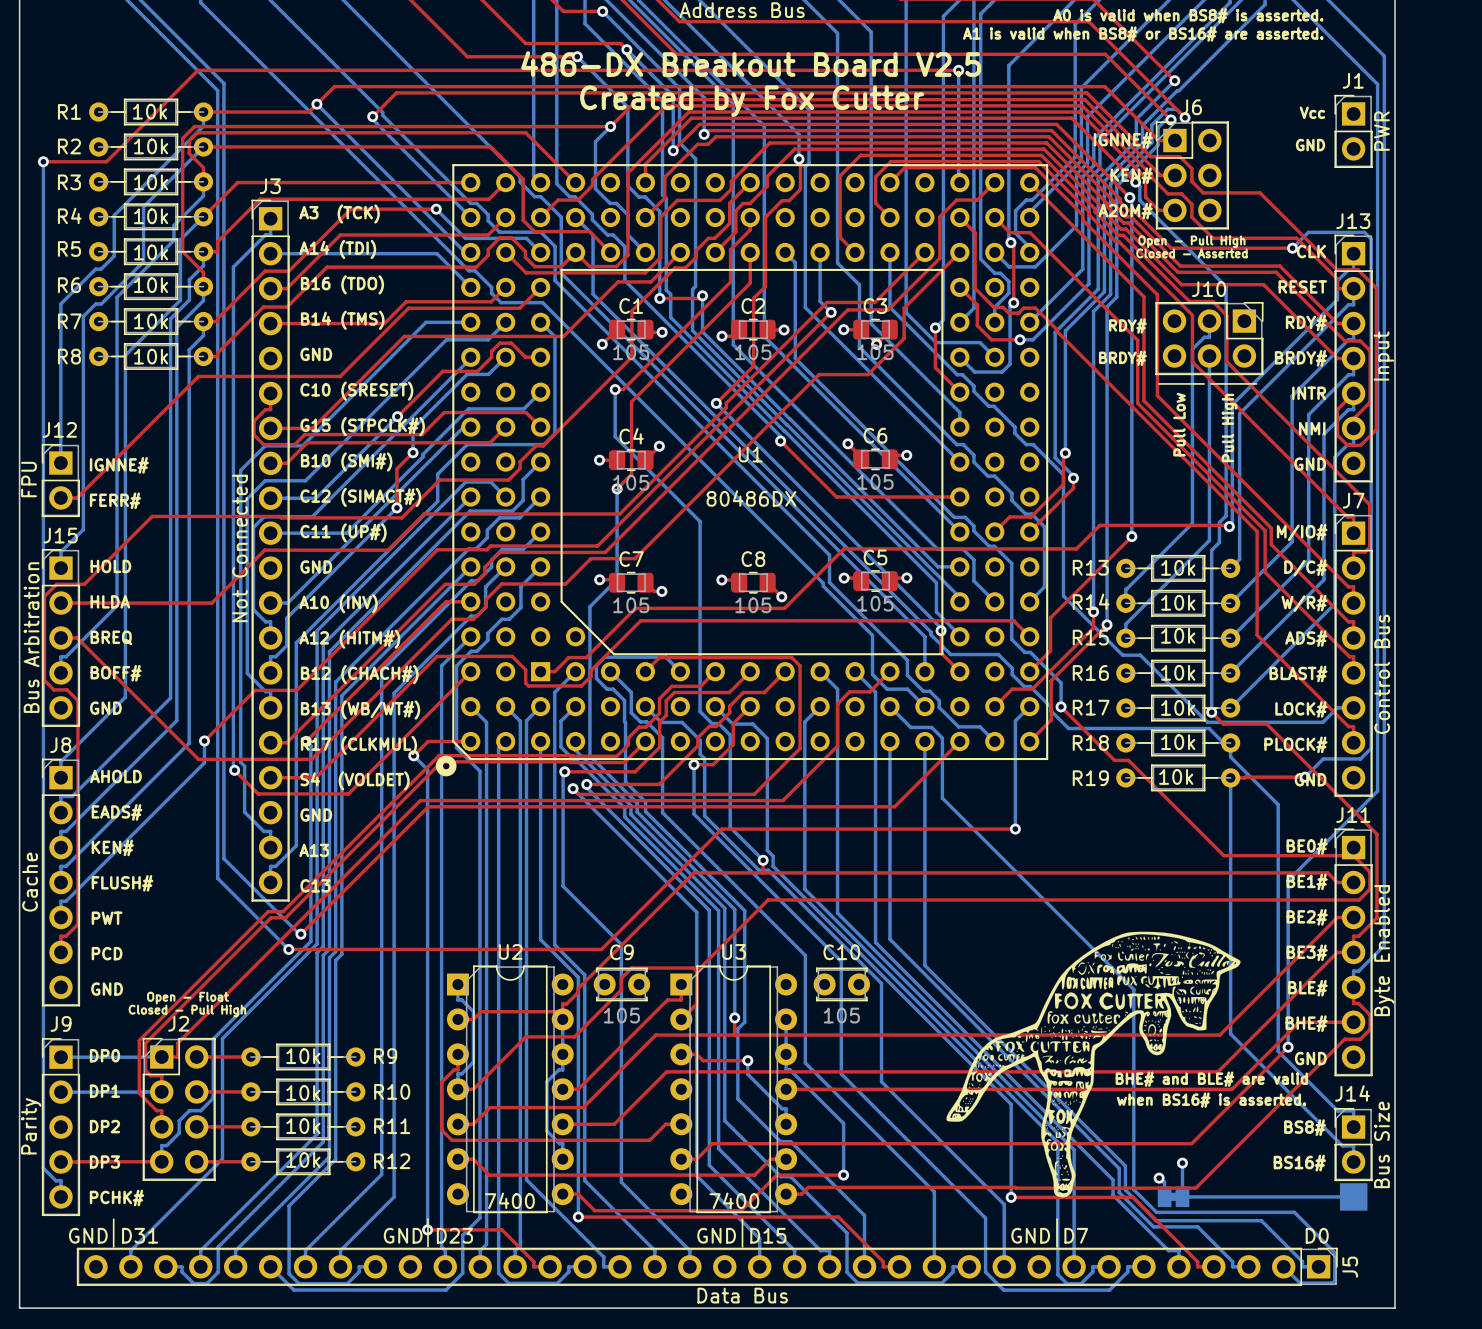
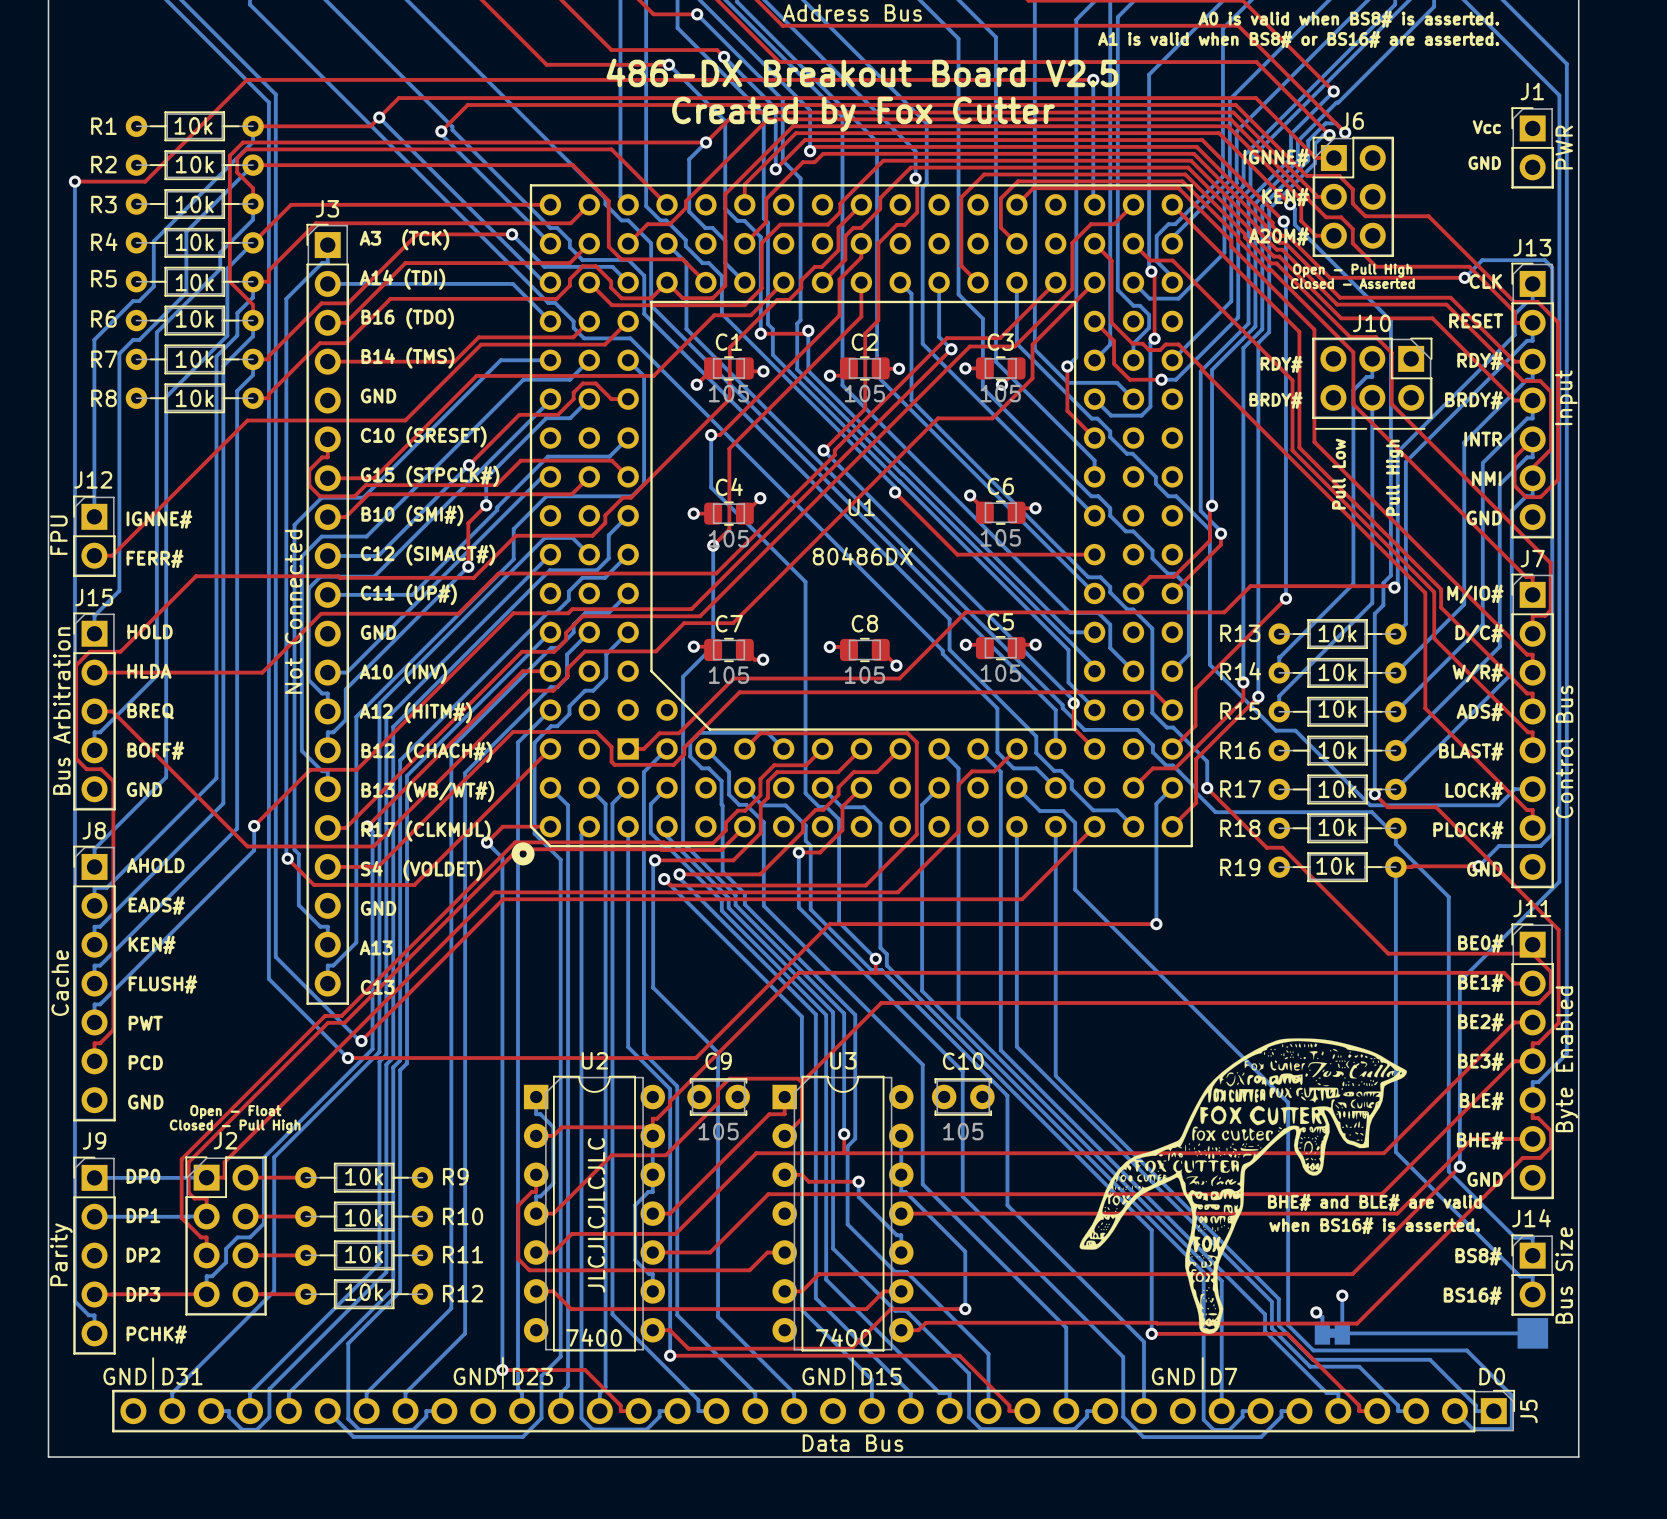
text: none -> JLCJLCJLCJLC (596, 1215)

